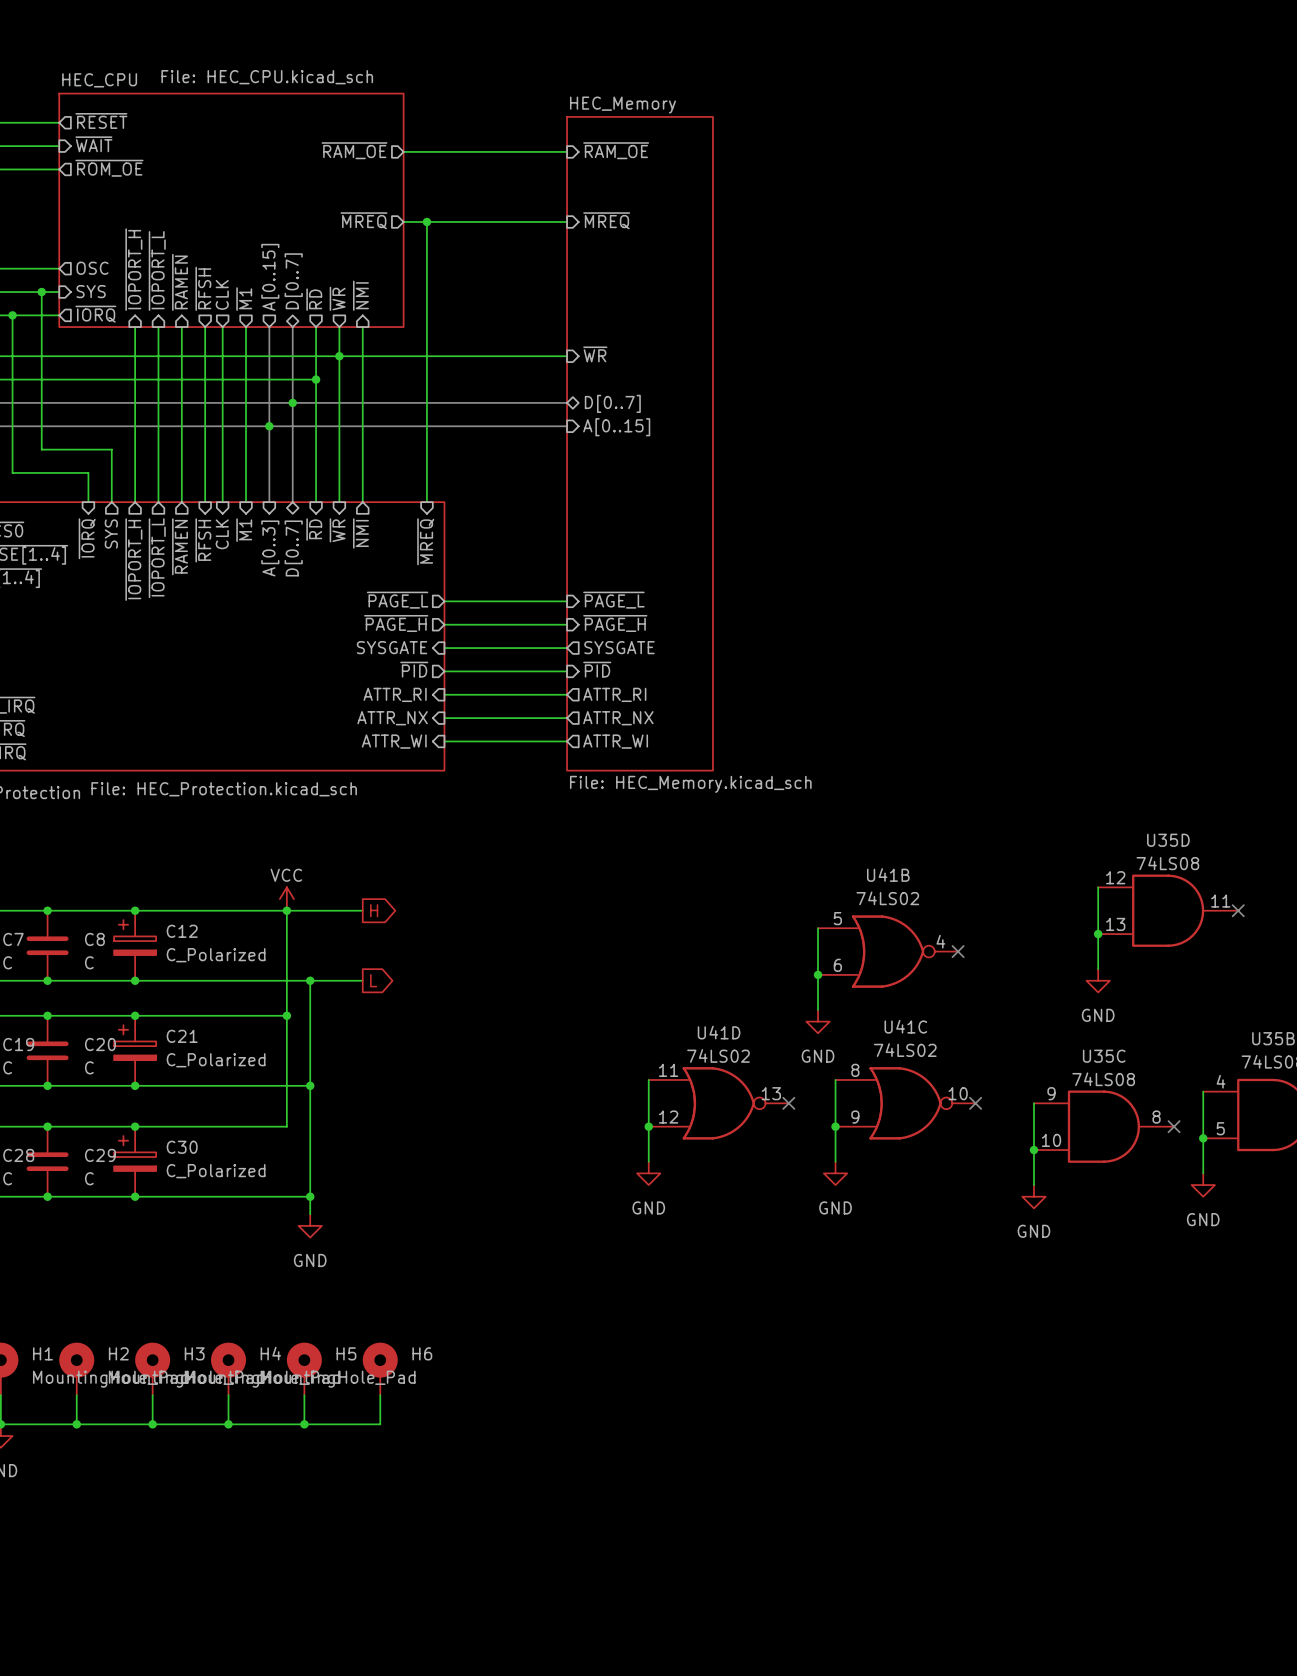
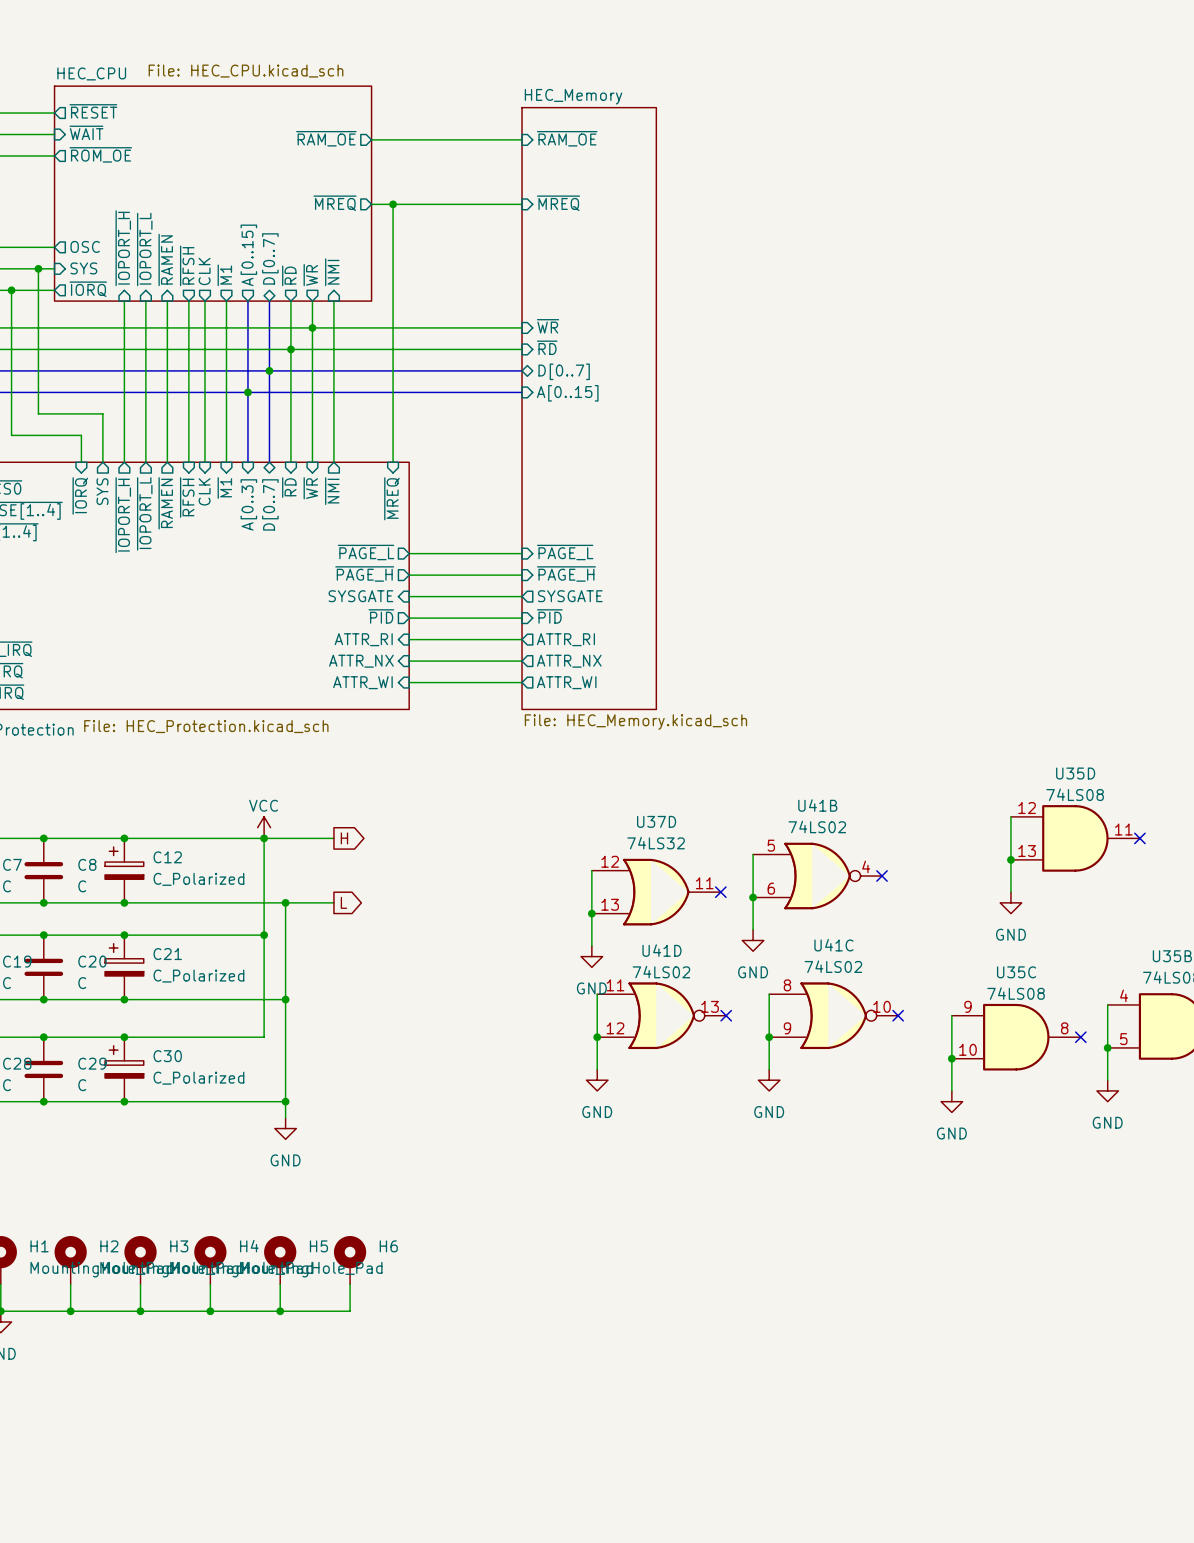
sheet pin: none -> ~{RD} (547, 347)
wire: none -> (290, 349) (522, 349)
wire: none -> (591, 870) (591, 945)
U37D: none -> 74LS32 (656, 892)
no-connect mark: none -> (720, 892)
junction: none -> (591, 913)
power symbol: none -> GND (591, 956)

